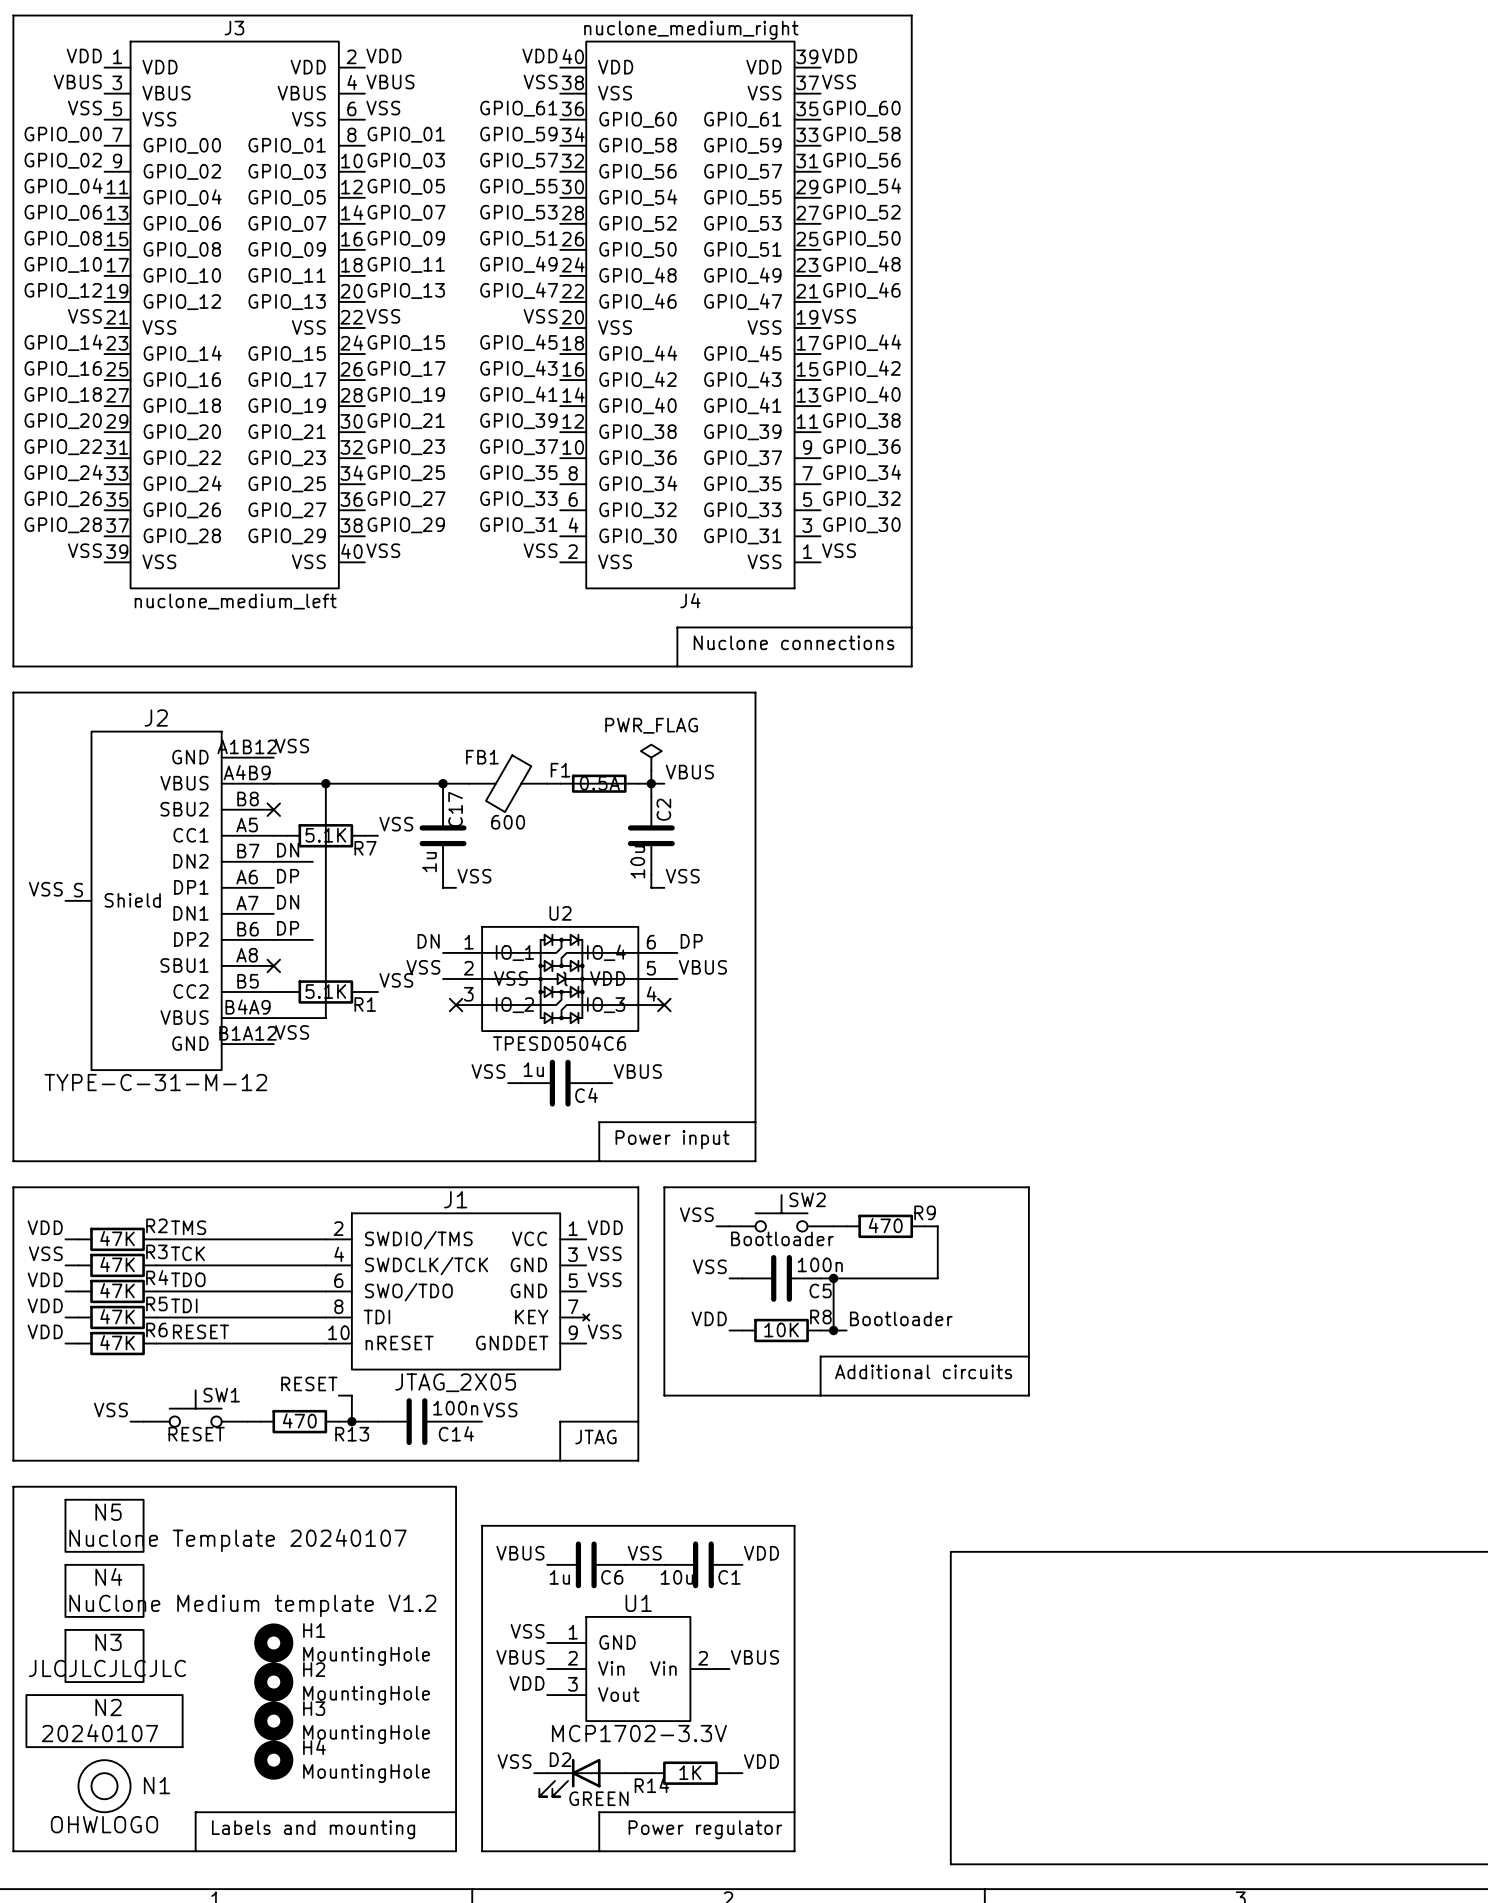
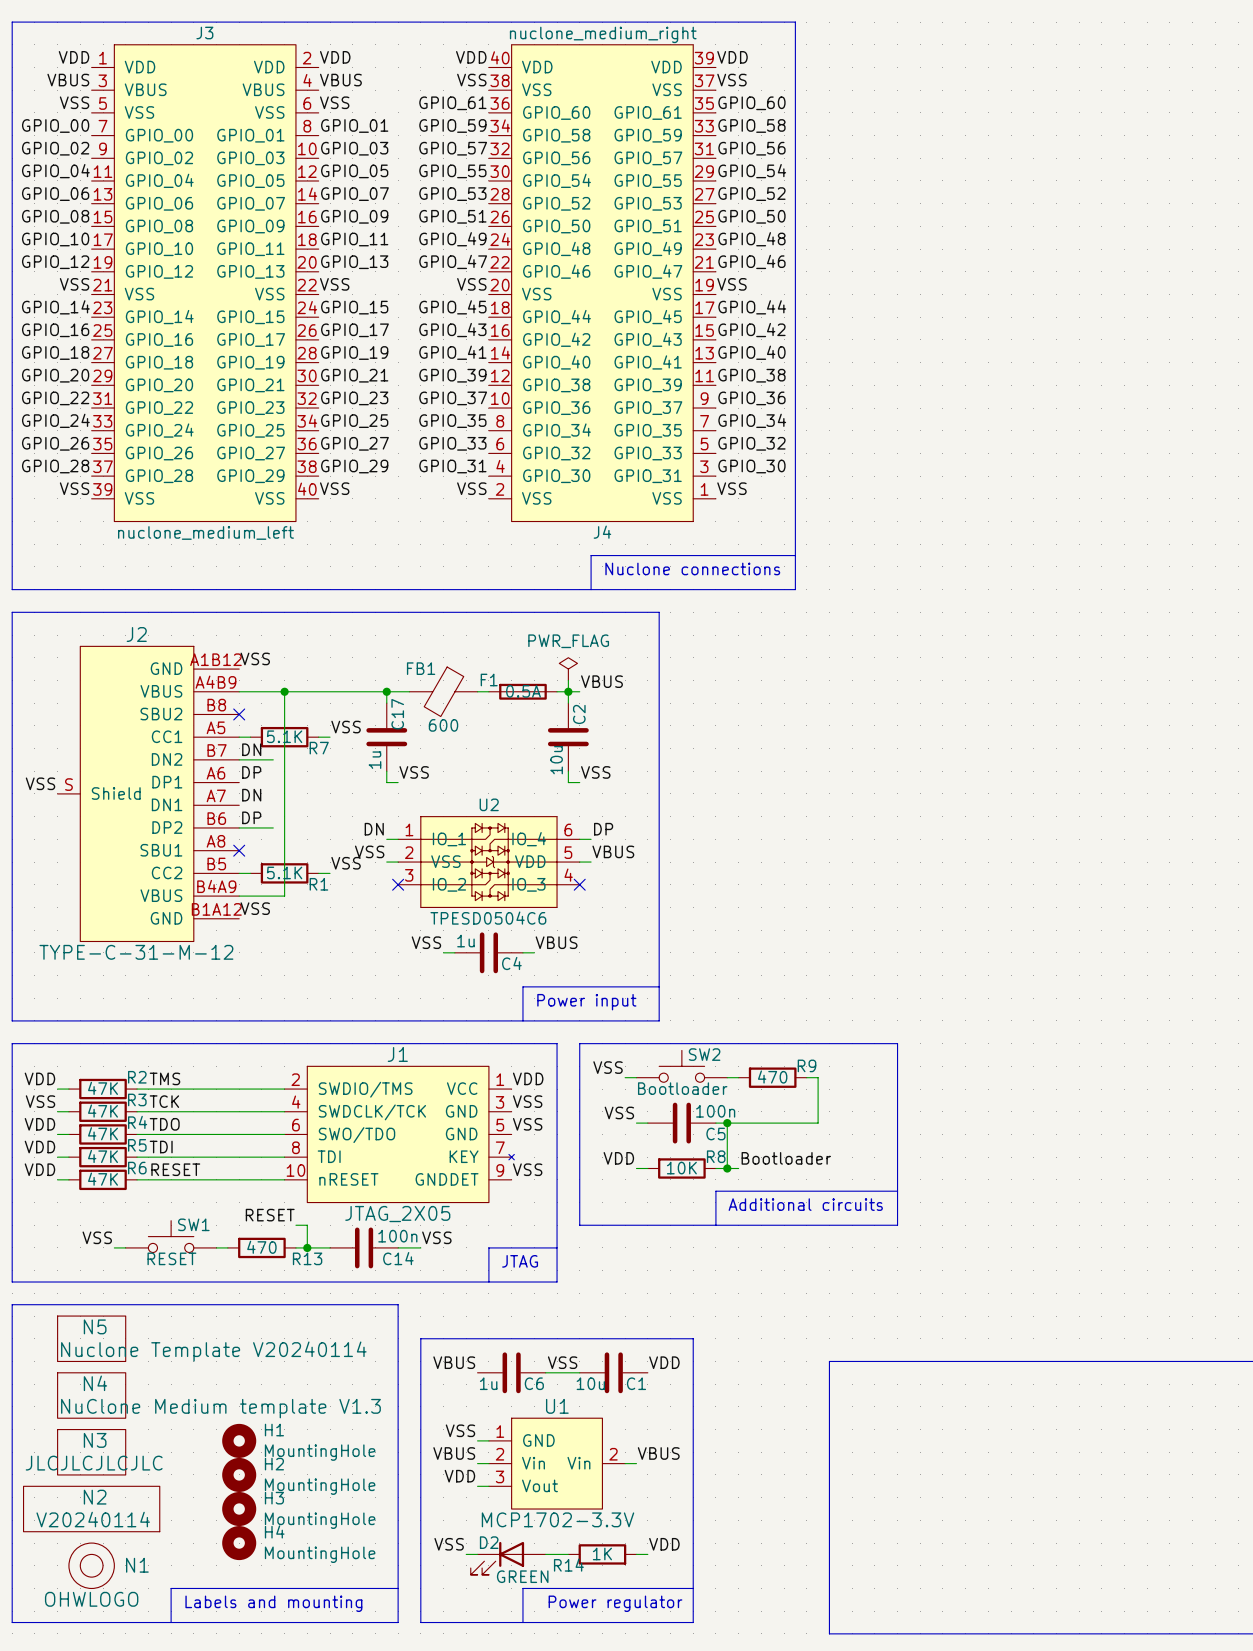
N5 value: Nuclone Template 20240107 (237, 1540) -> Nuclone Template V20240114 (213, 1351)
N4 value: NuClone Medium template V1.2 (252, 1605) -> NuClone Medium template V1.3 (220, 1408)
N2 value: 20240107 (99, 1733) -> V20240114 (93, 1519)

